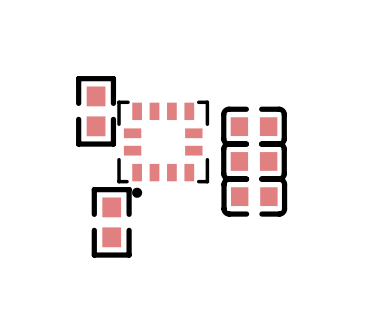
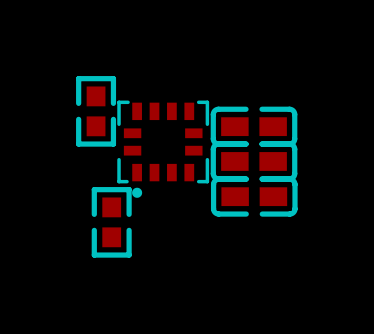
part footprint: [221, 106, 287, 147] -> [210, 106, 298, 147]
part footprint: [221, 141, 287, 182] -> [210, 141, 298, 182]
part footprint: [221, 176, 288, 217] -> [210, 176, 298, 217]

